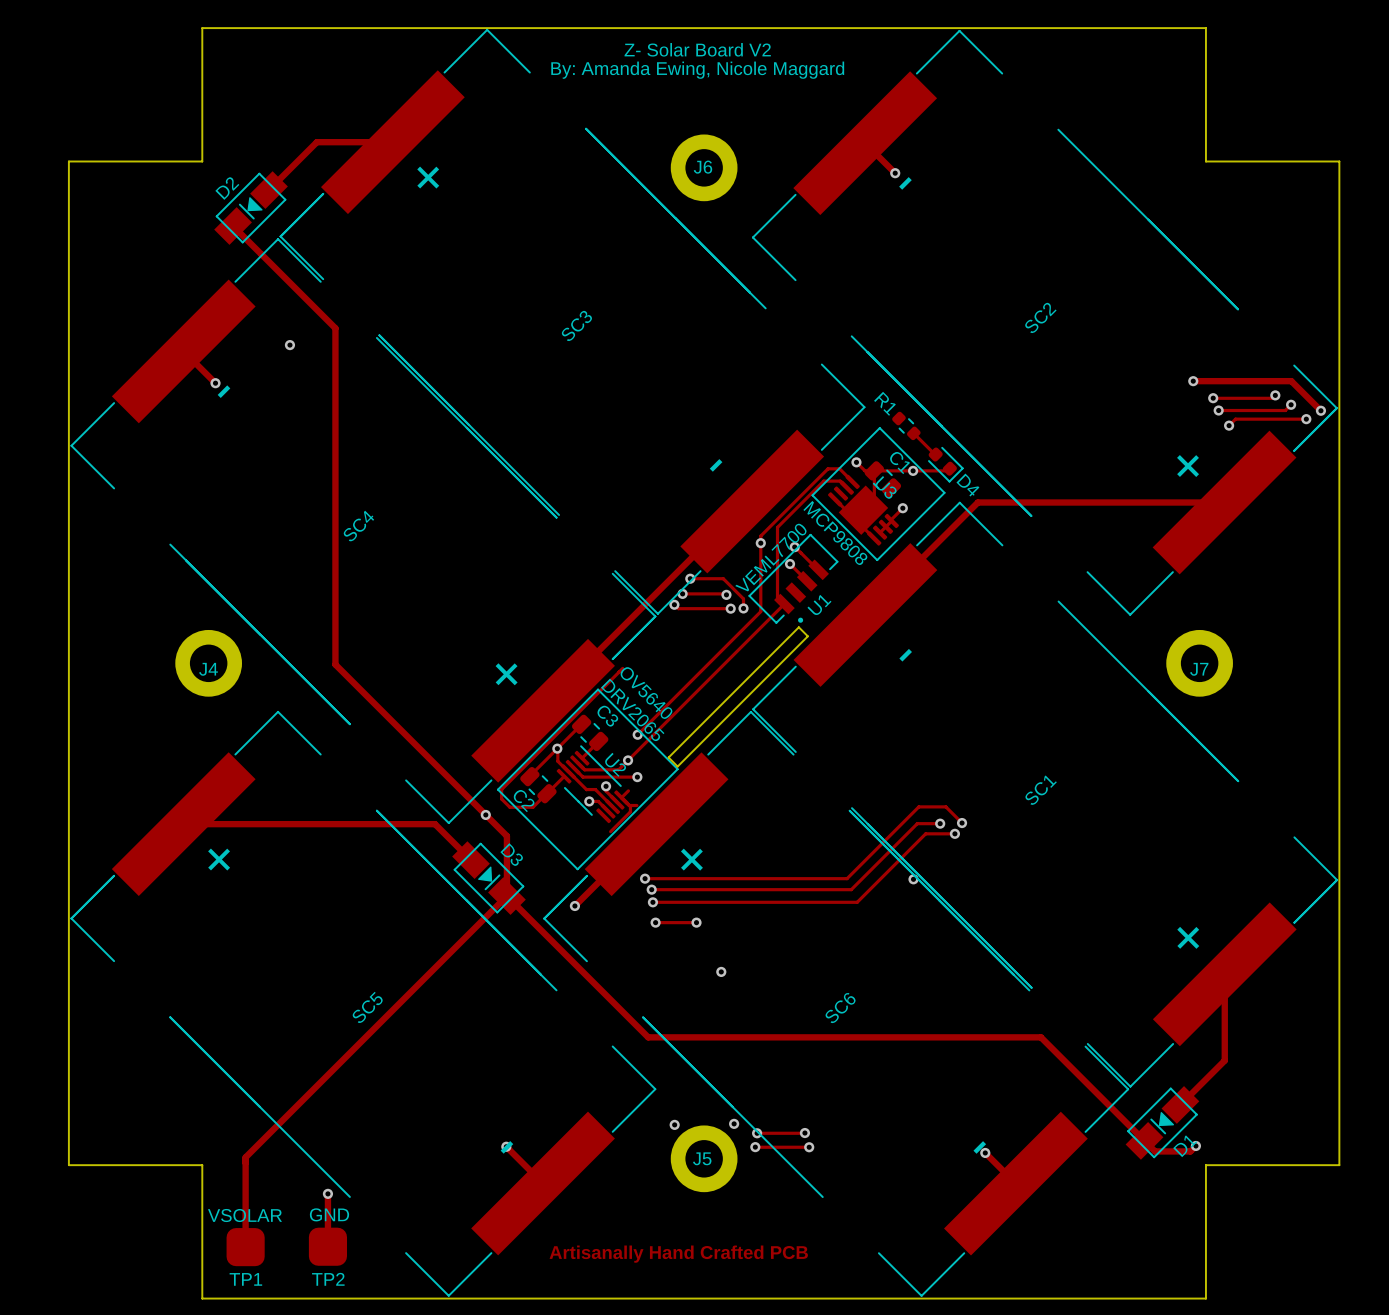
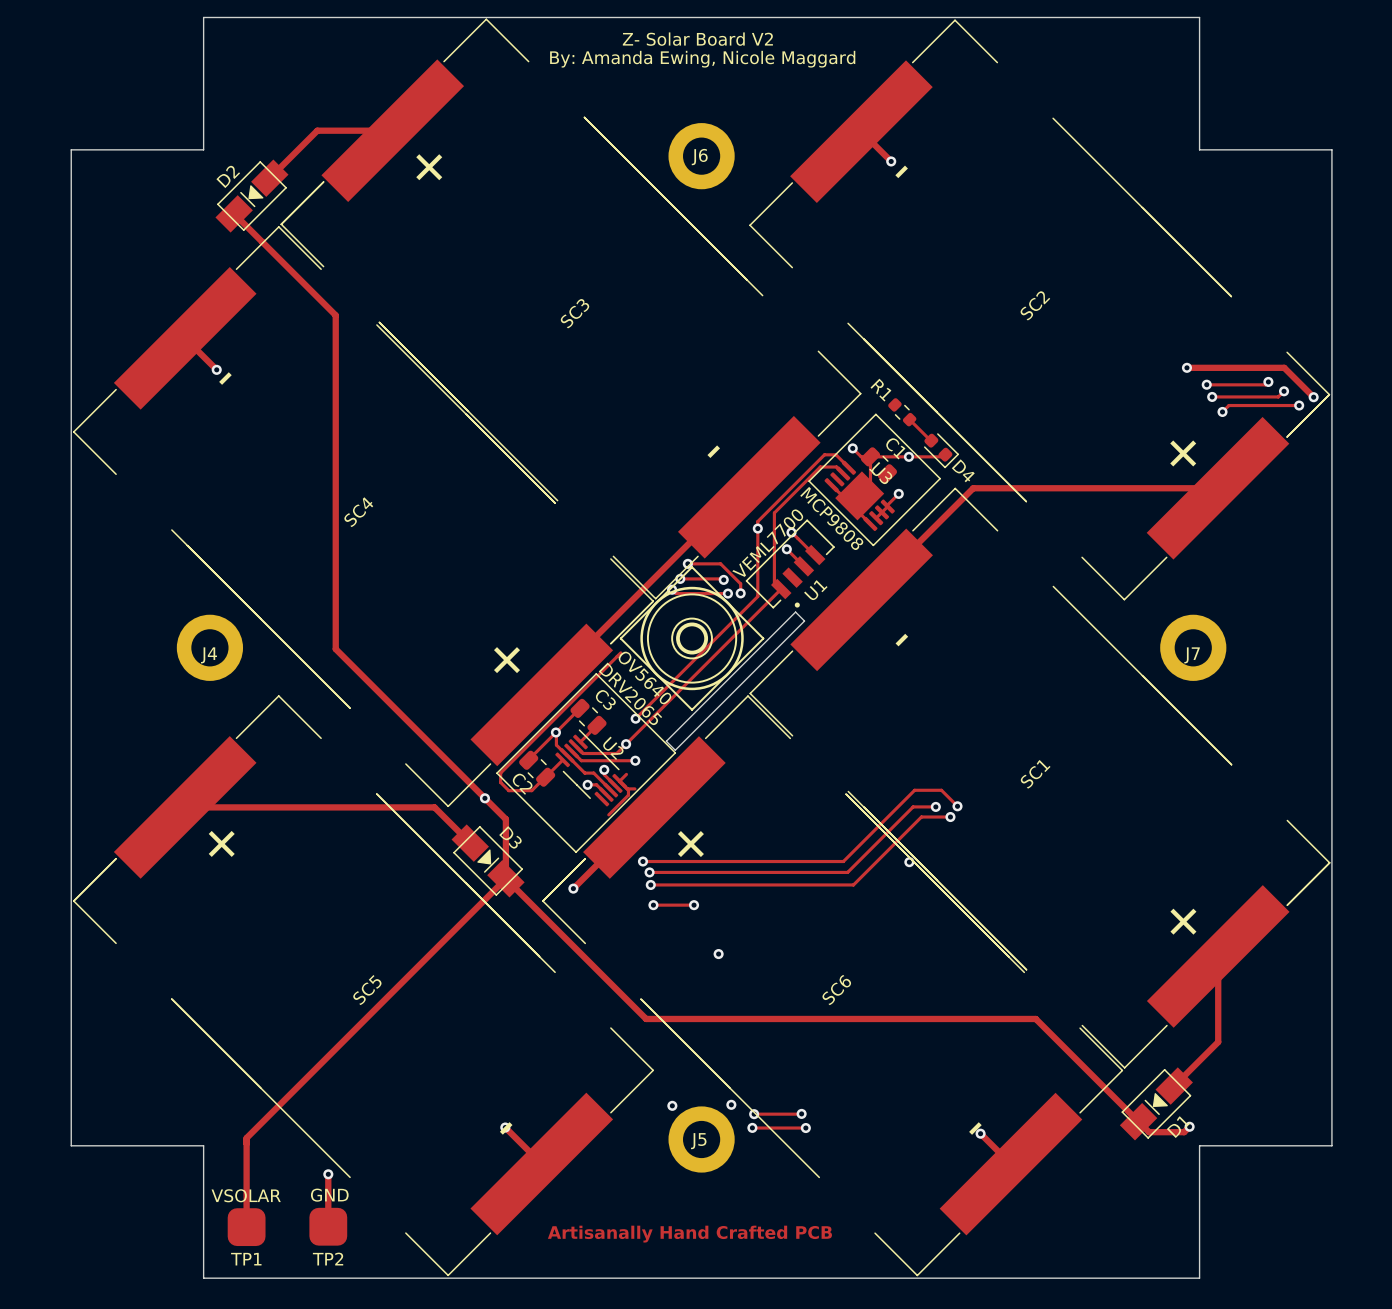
via: (289, 345) -> none
drawing: none -> [619, 566, 765, 711]

